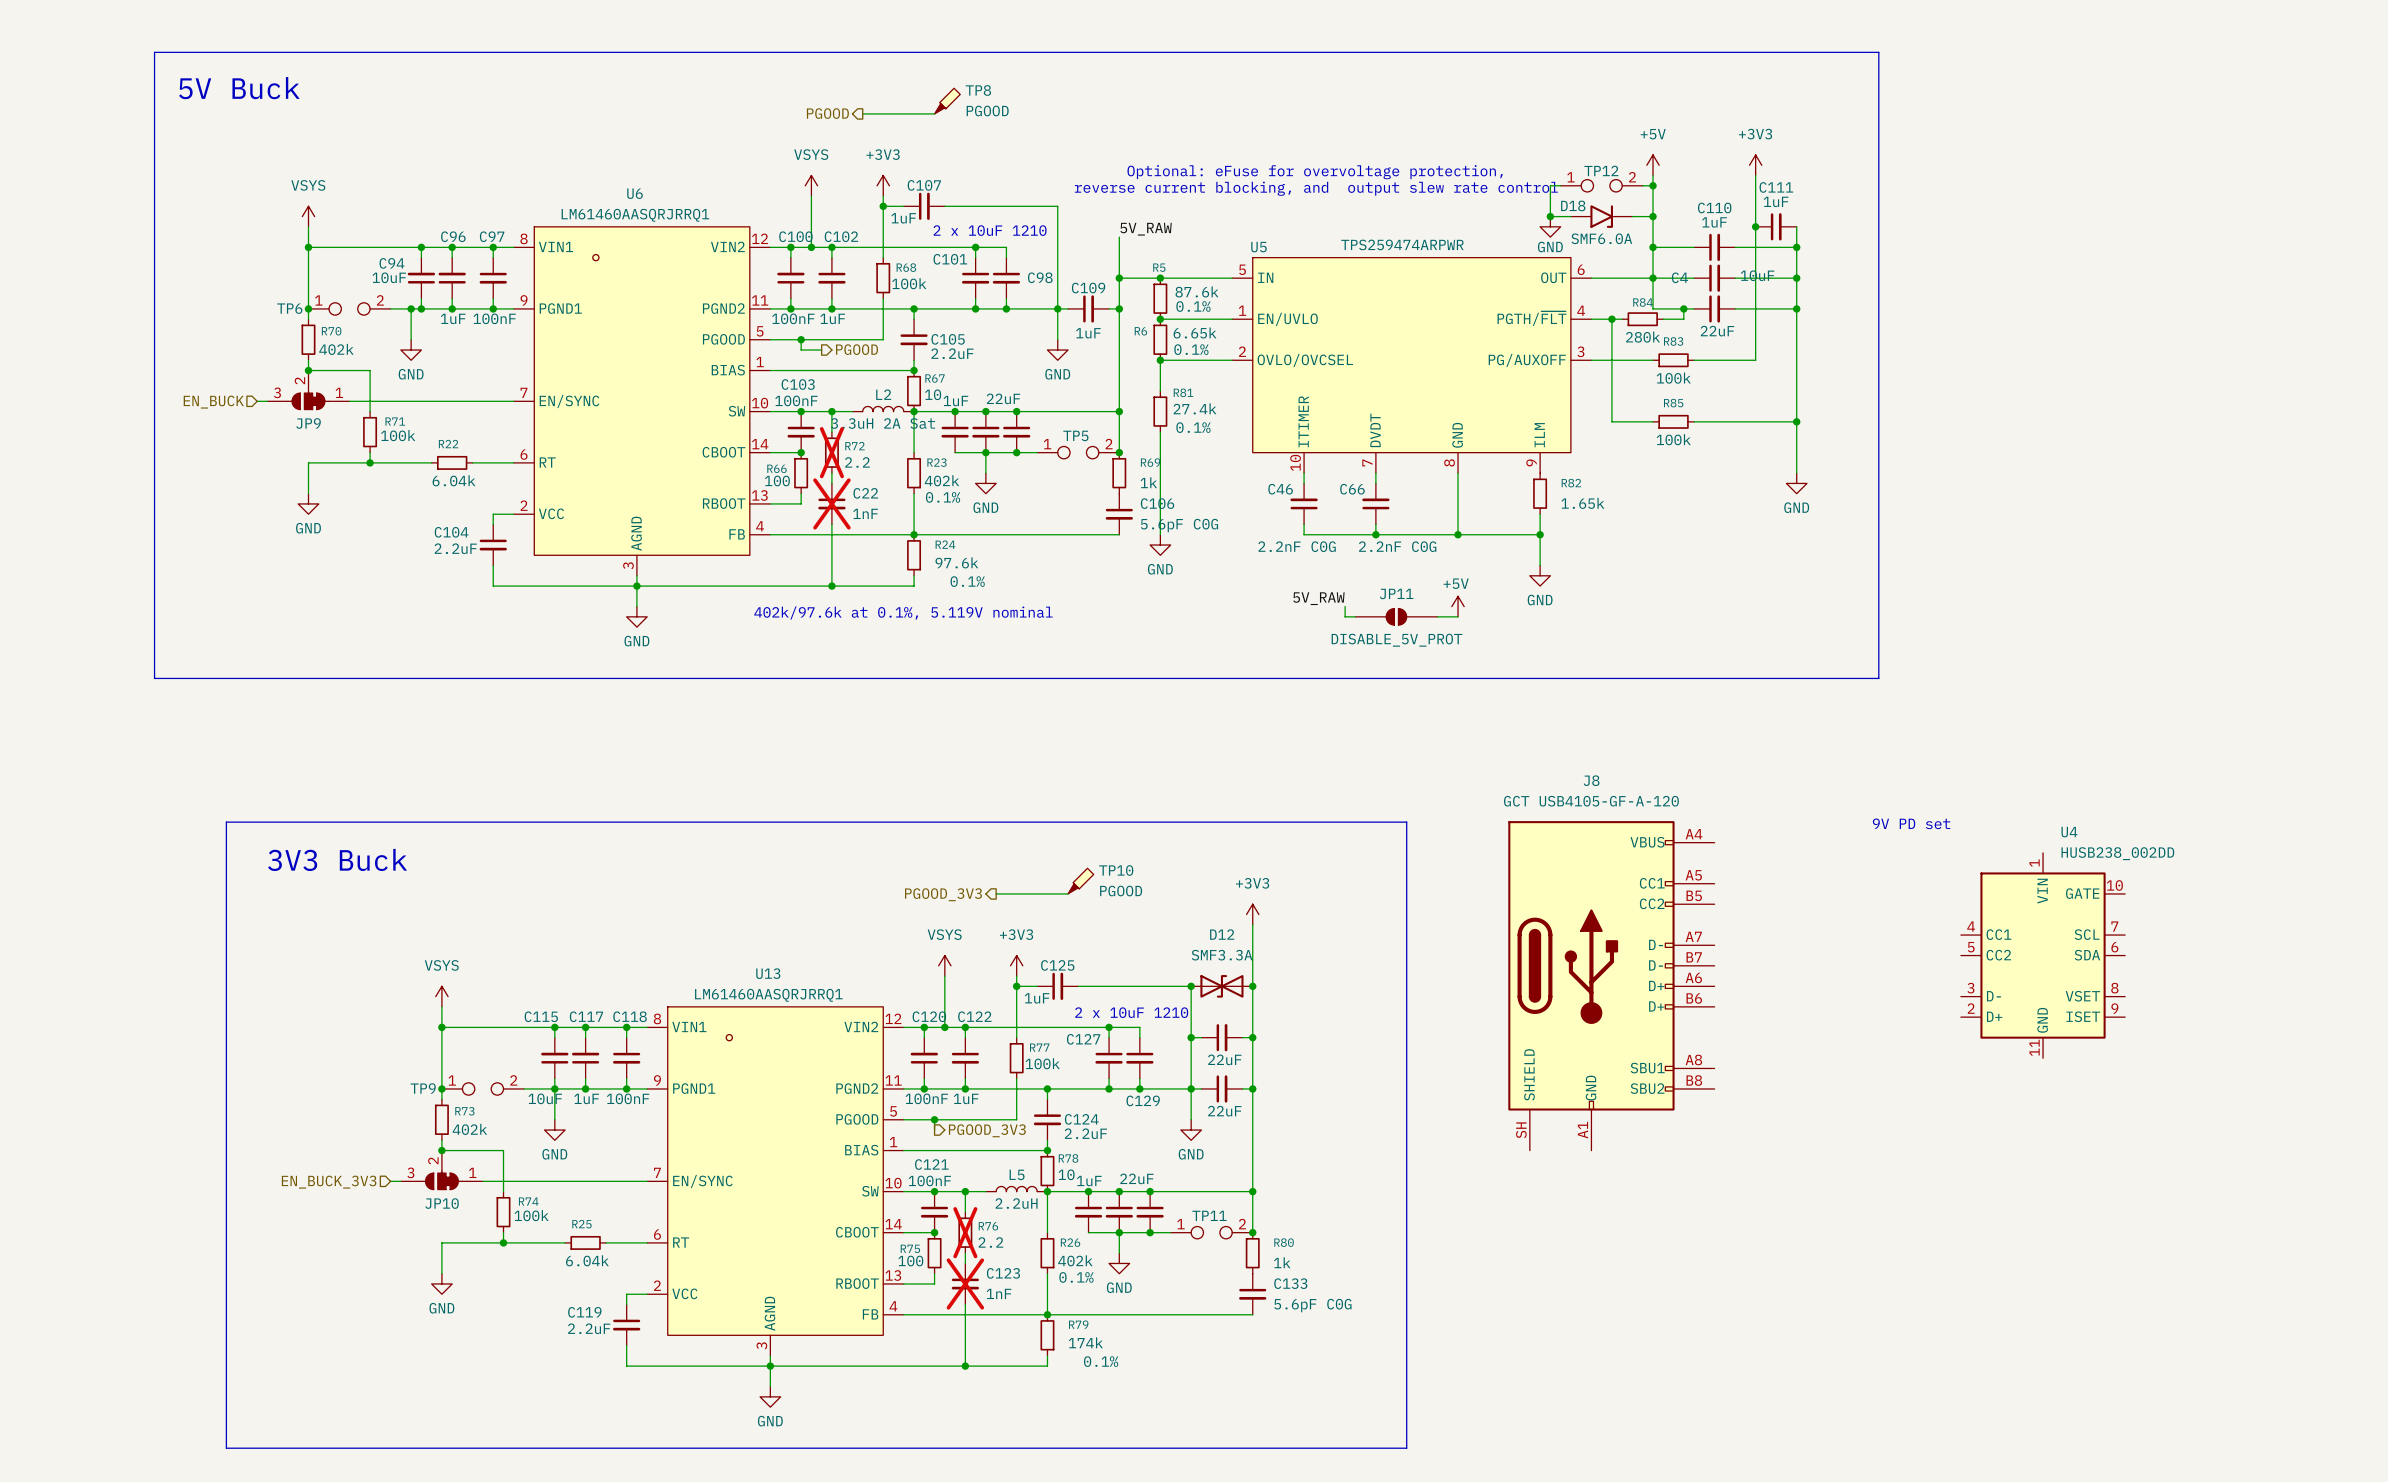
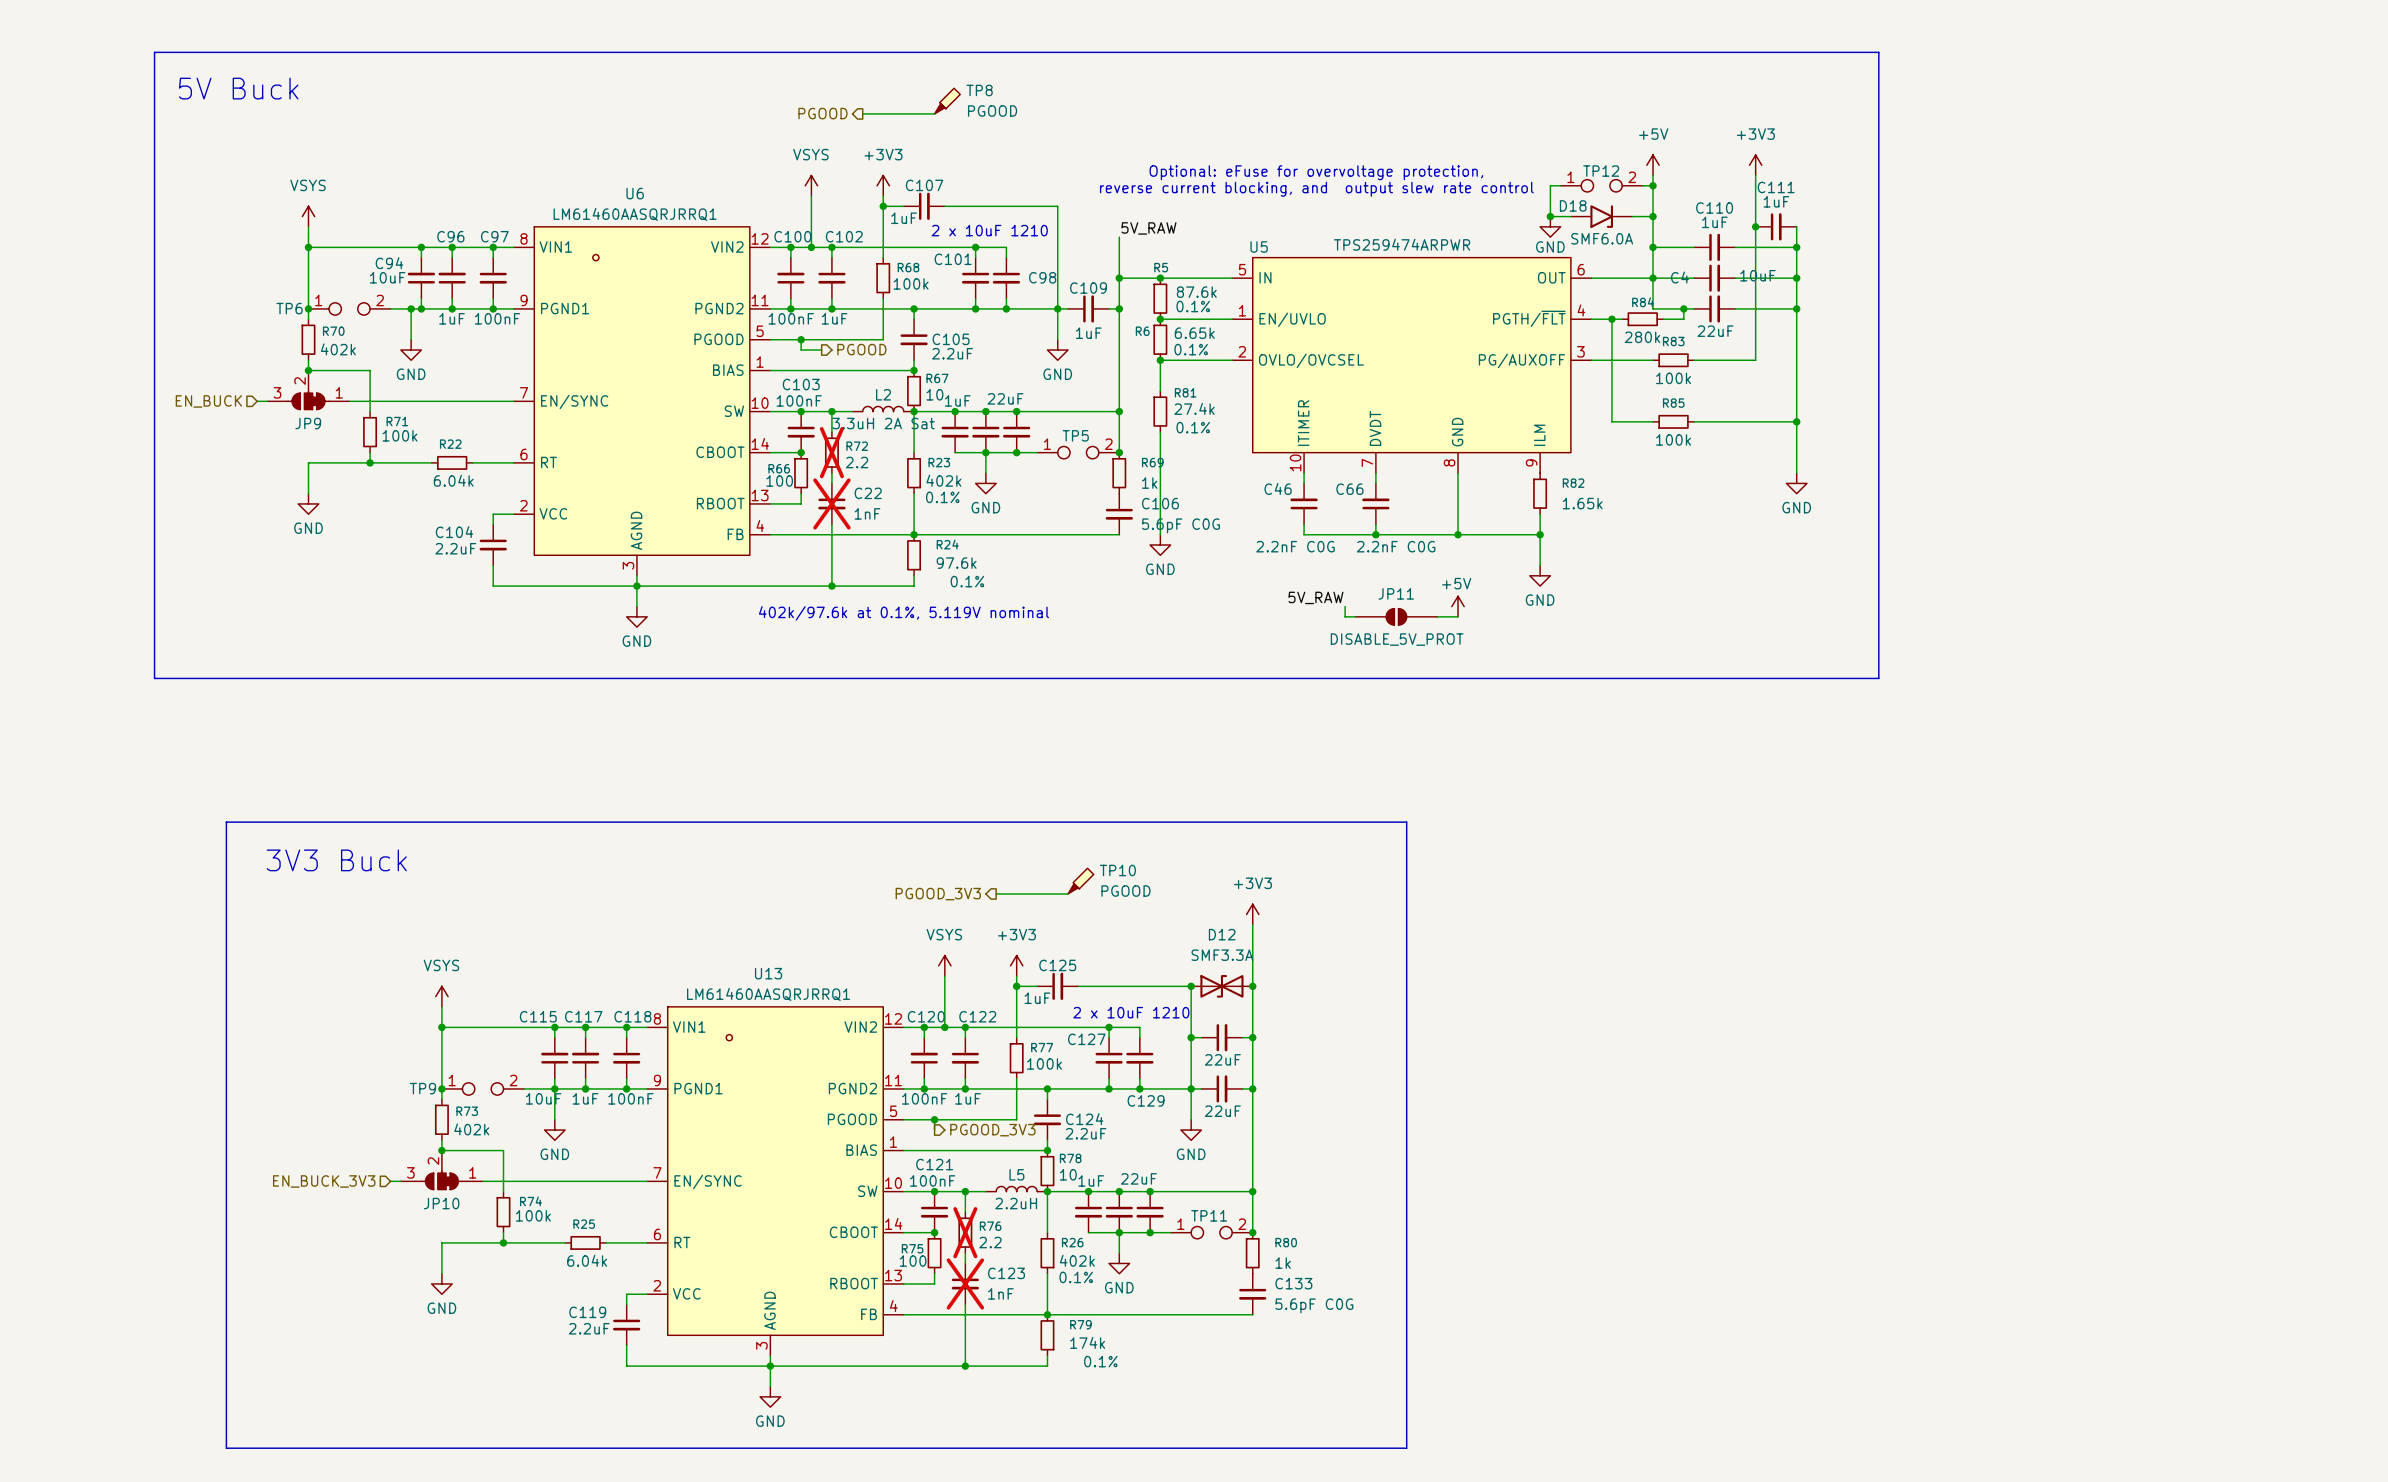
text: 9V PD set (1911, 823) -> none
U4: HUSB238_002DD (2043, 955) -> none
J8: GCT USB4105-GF-A-120 (1611, 985) -> none

